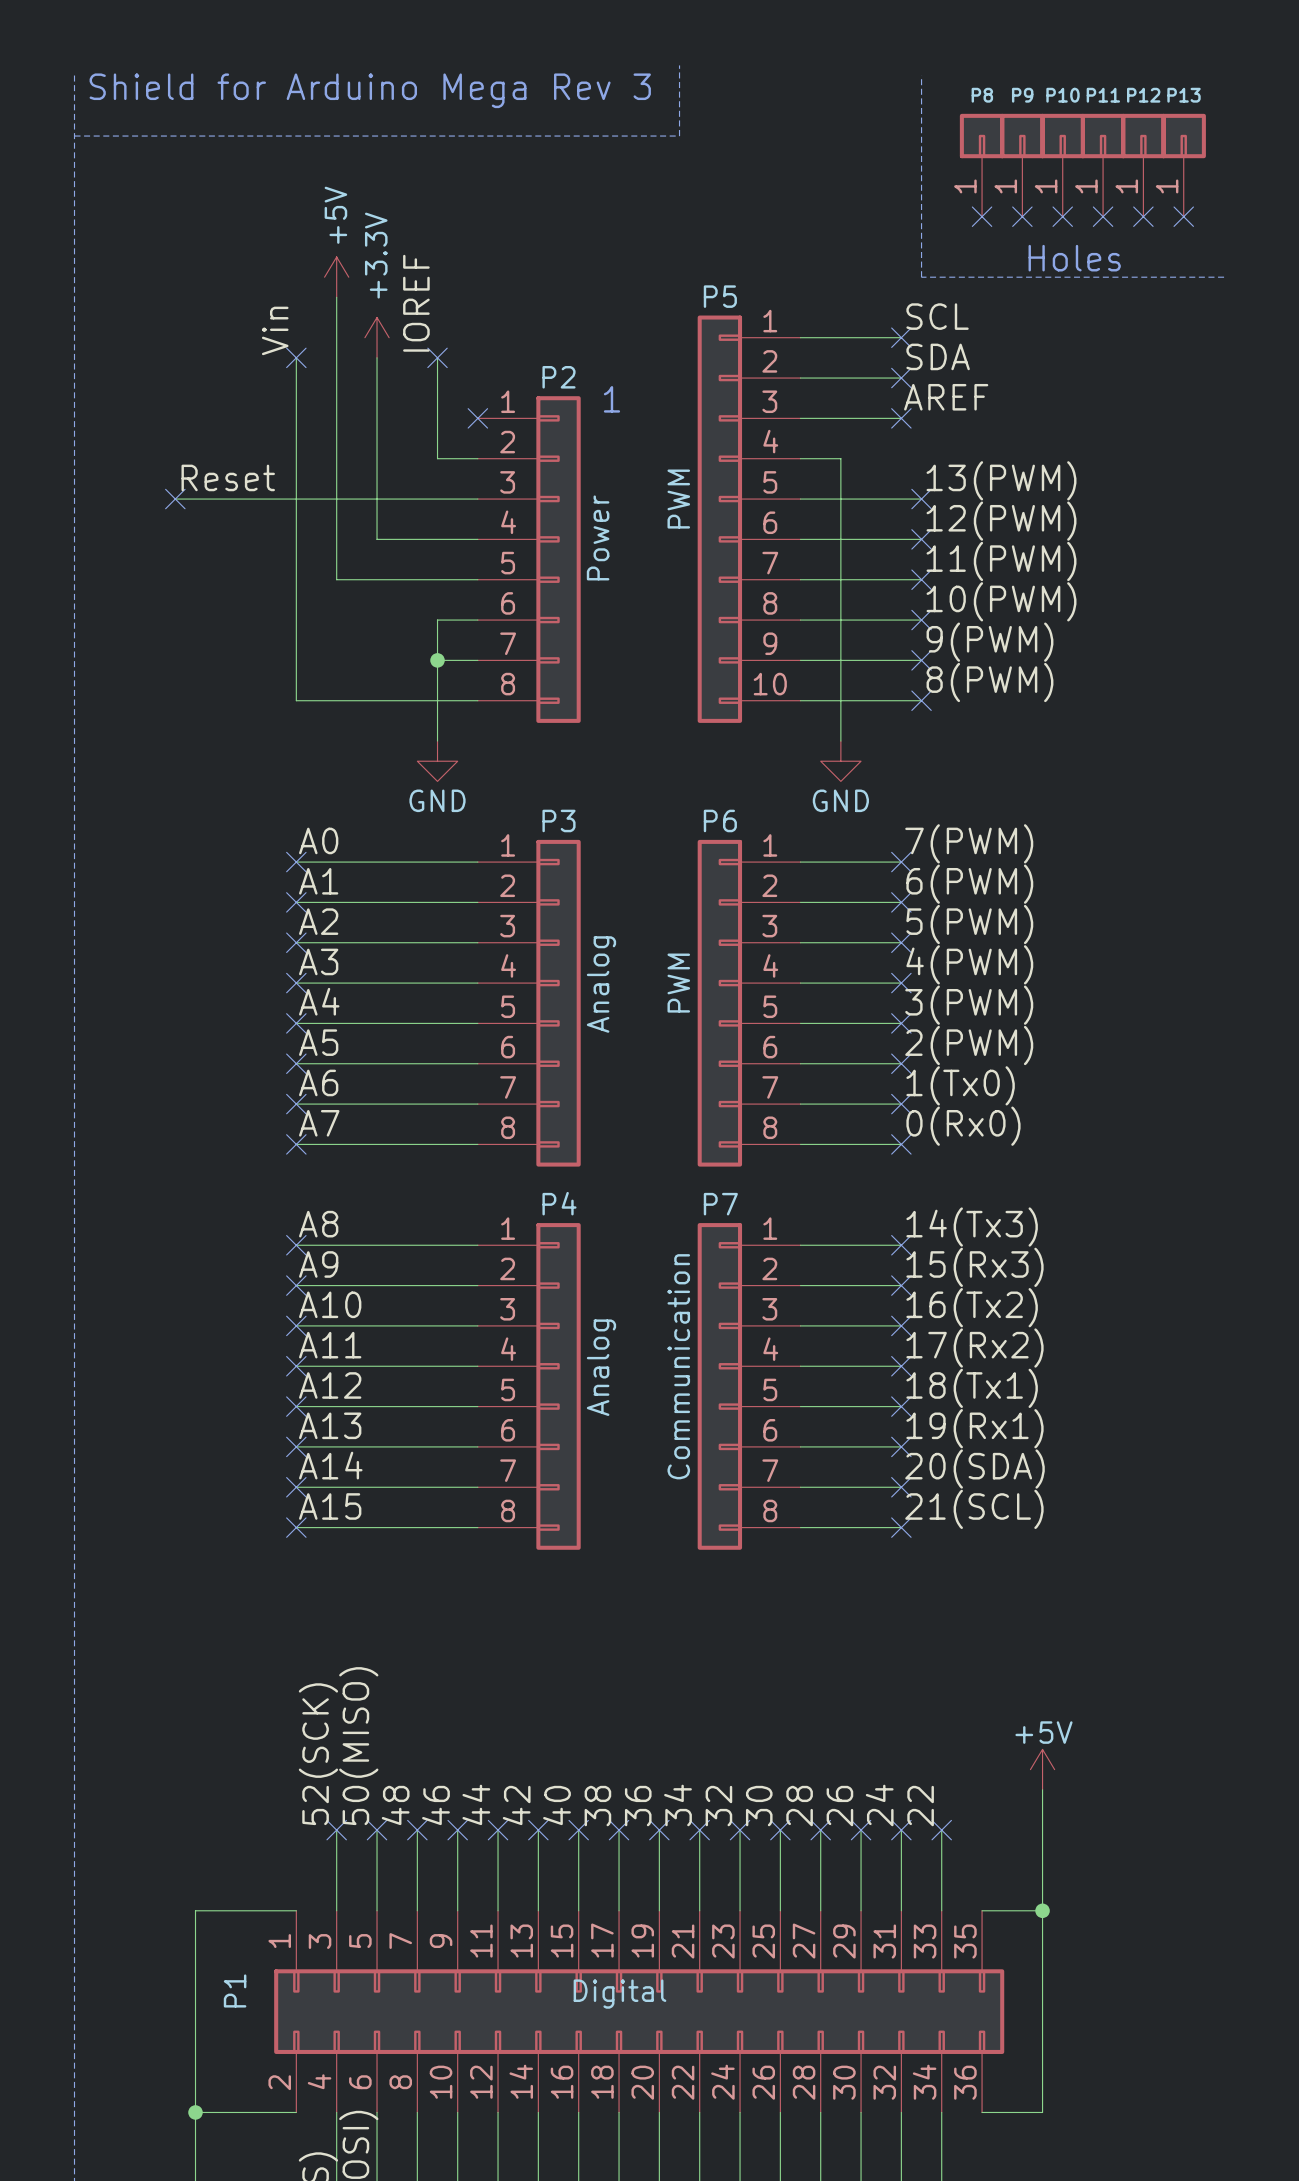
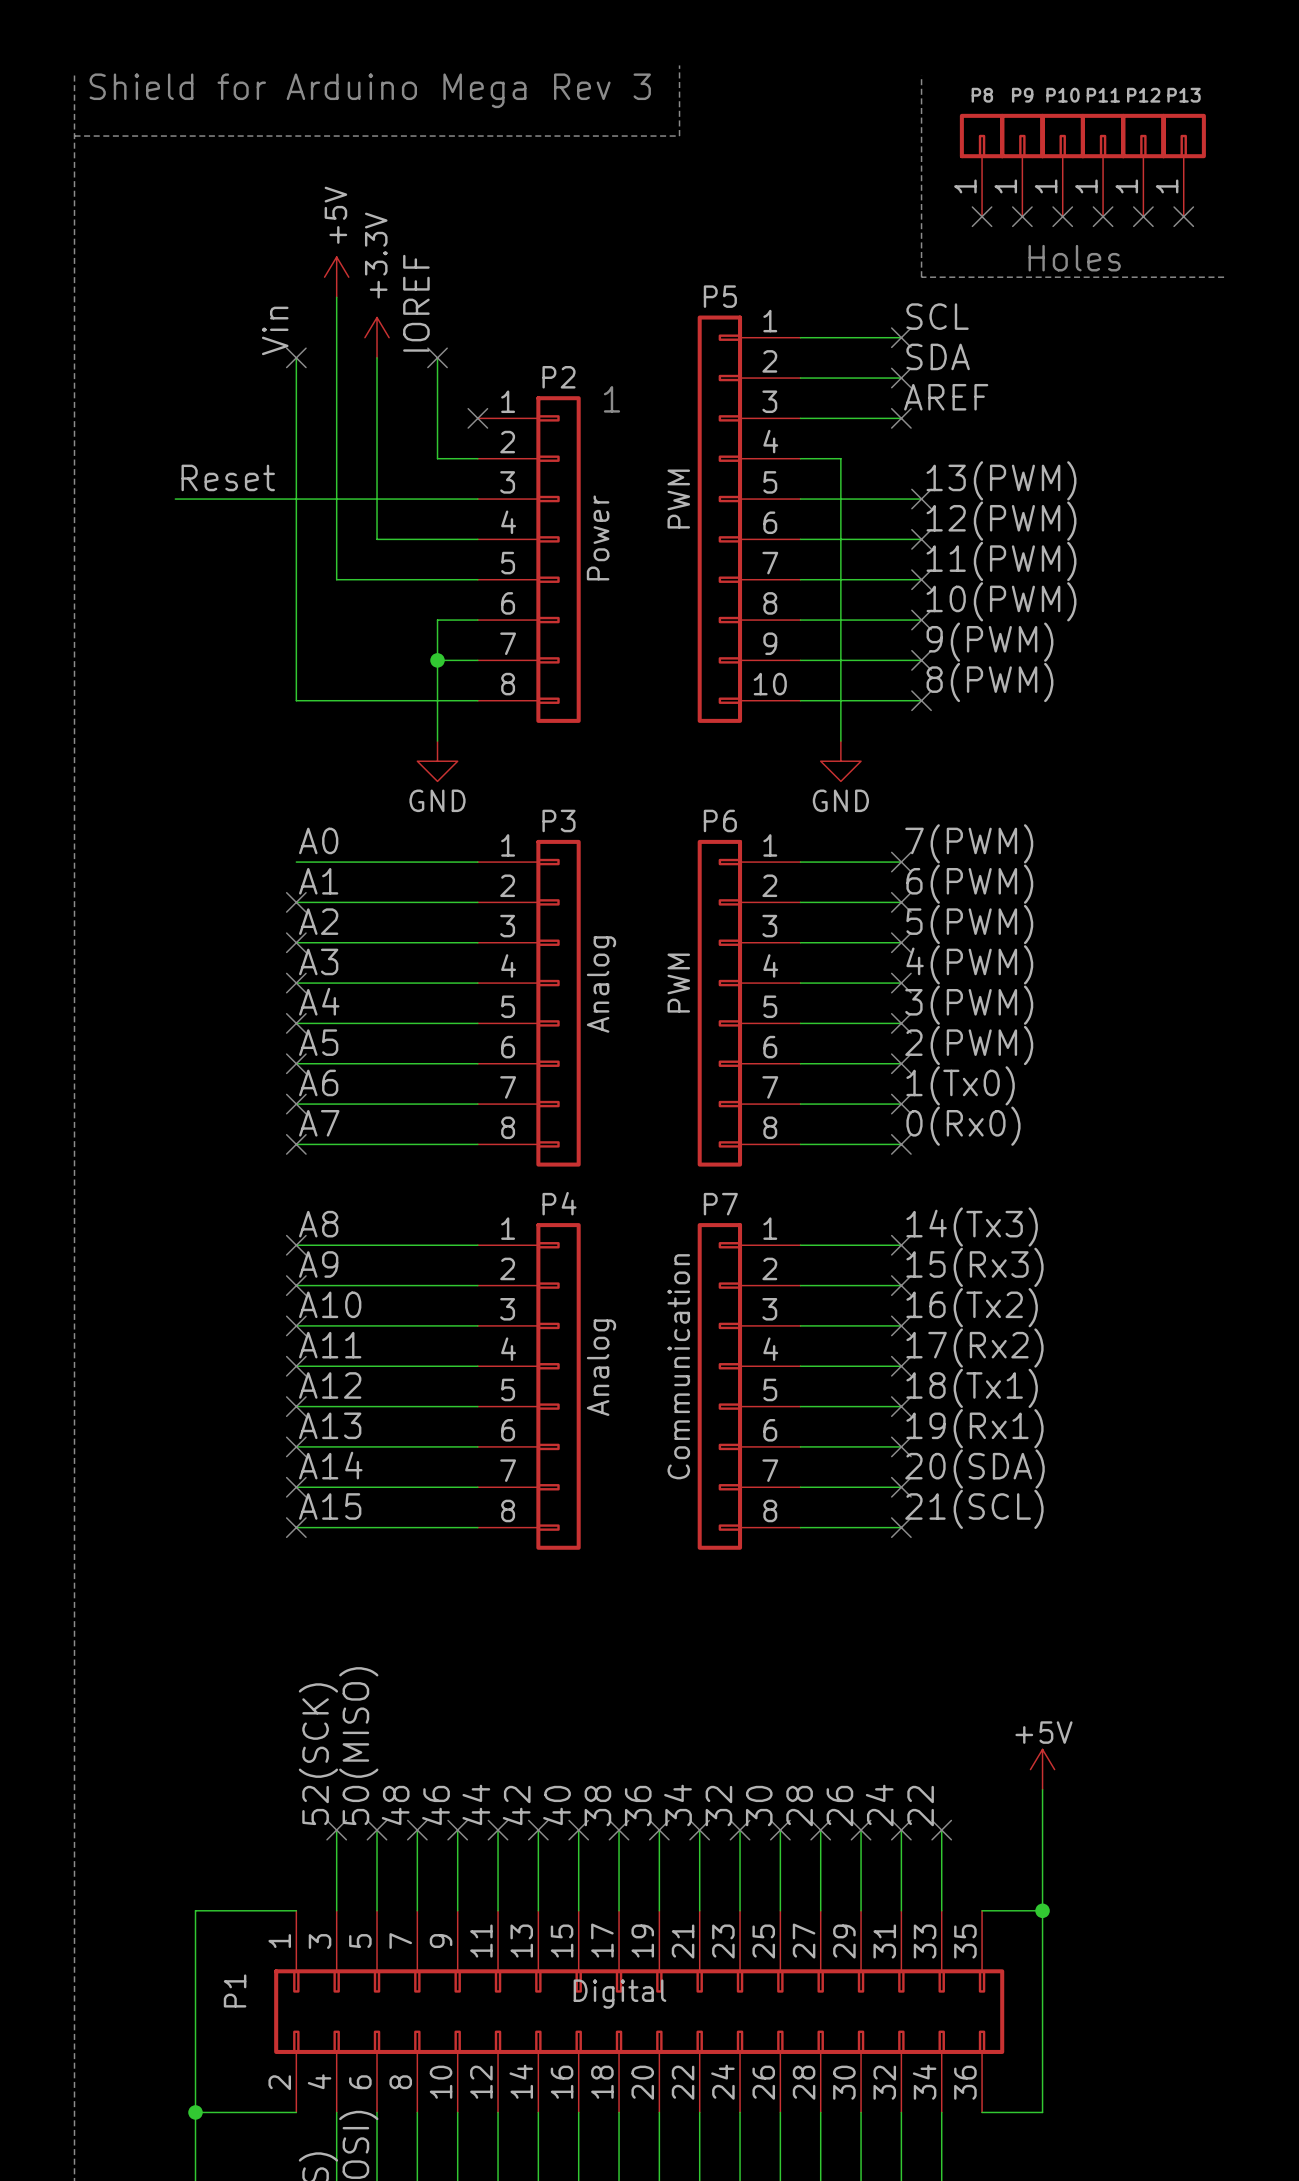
no-connect mark: (175, 499) -> none
no-connect mark: (296, 862) -> none

